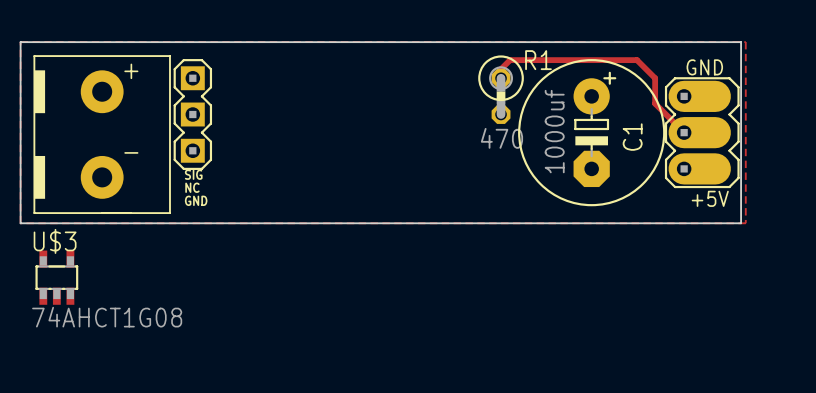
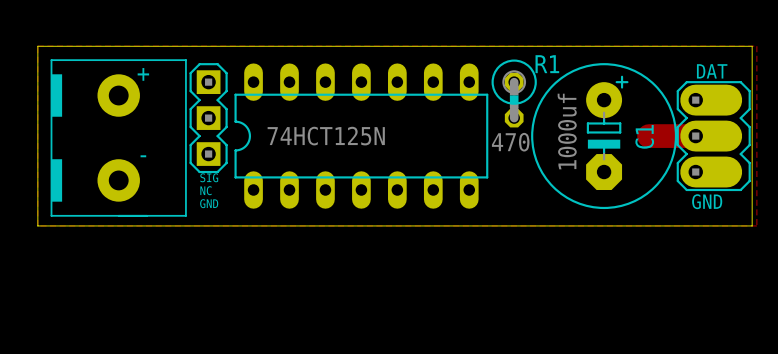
part text: GND (704, 67) -> DAT (712, 71)
track: (501, 78) (501, 69) (510, 60) (637, 60) (655, 78) (655, 103) (684, 132) -> none
part: none -> 74HCT125N (361, 136)
track: none -> (649, 136) (702, 136)
part text: none -> GND (707, 201)
part text: +5V (710, 198) -> none
U$3: 74AHCT1G08 (56, 277) -> none

